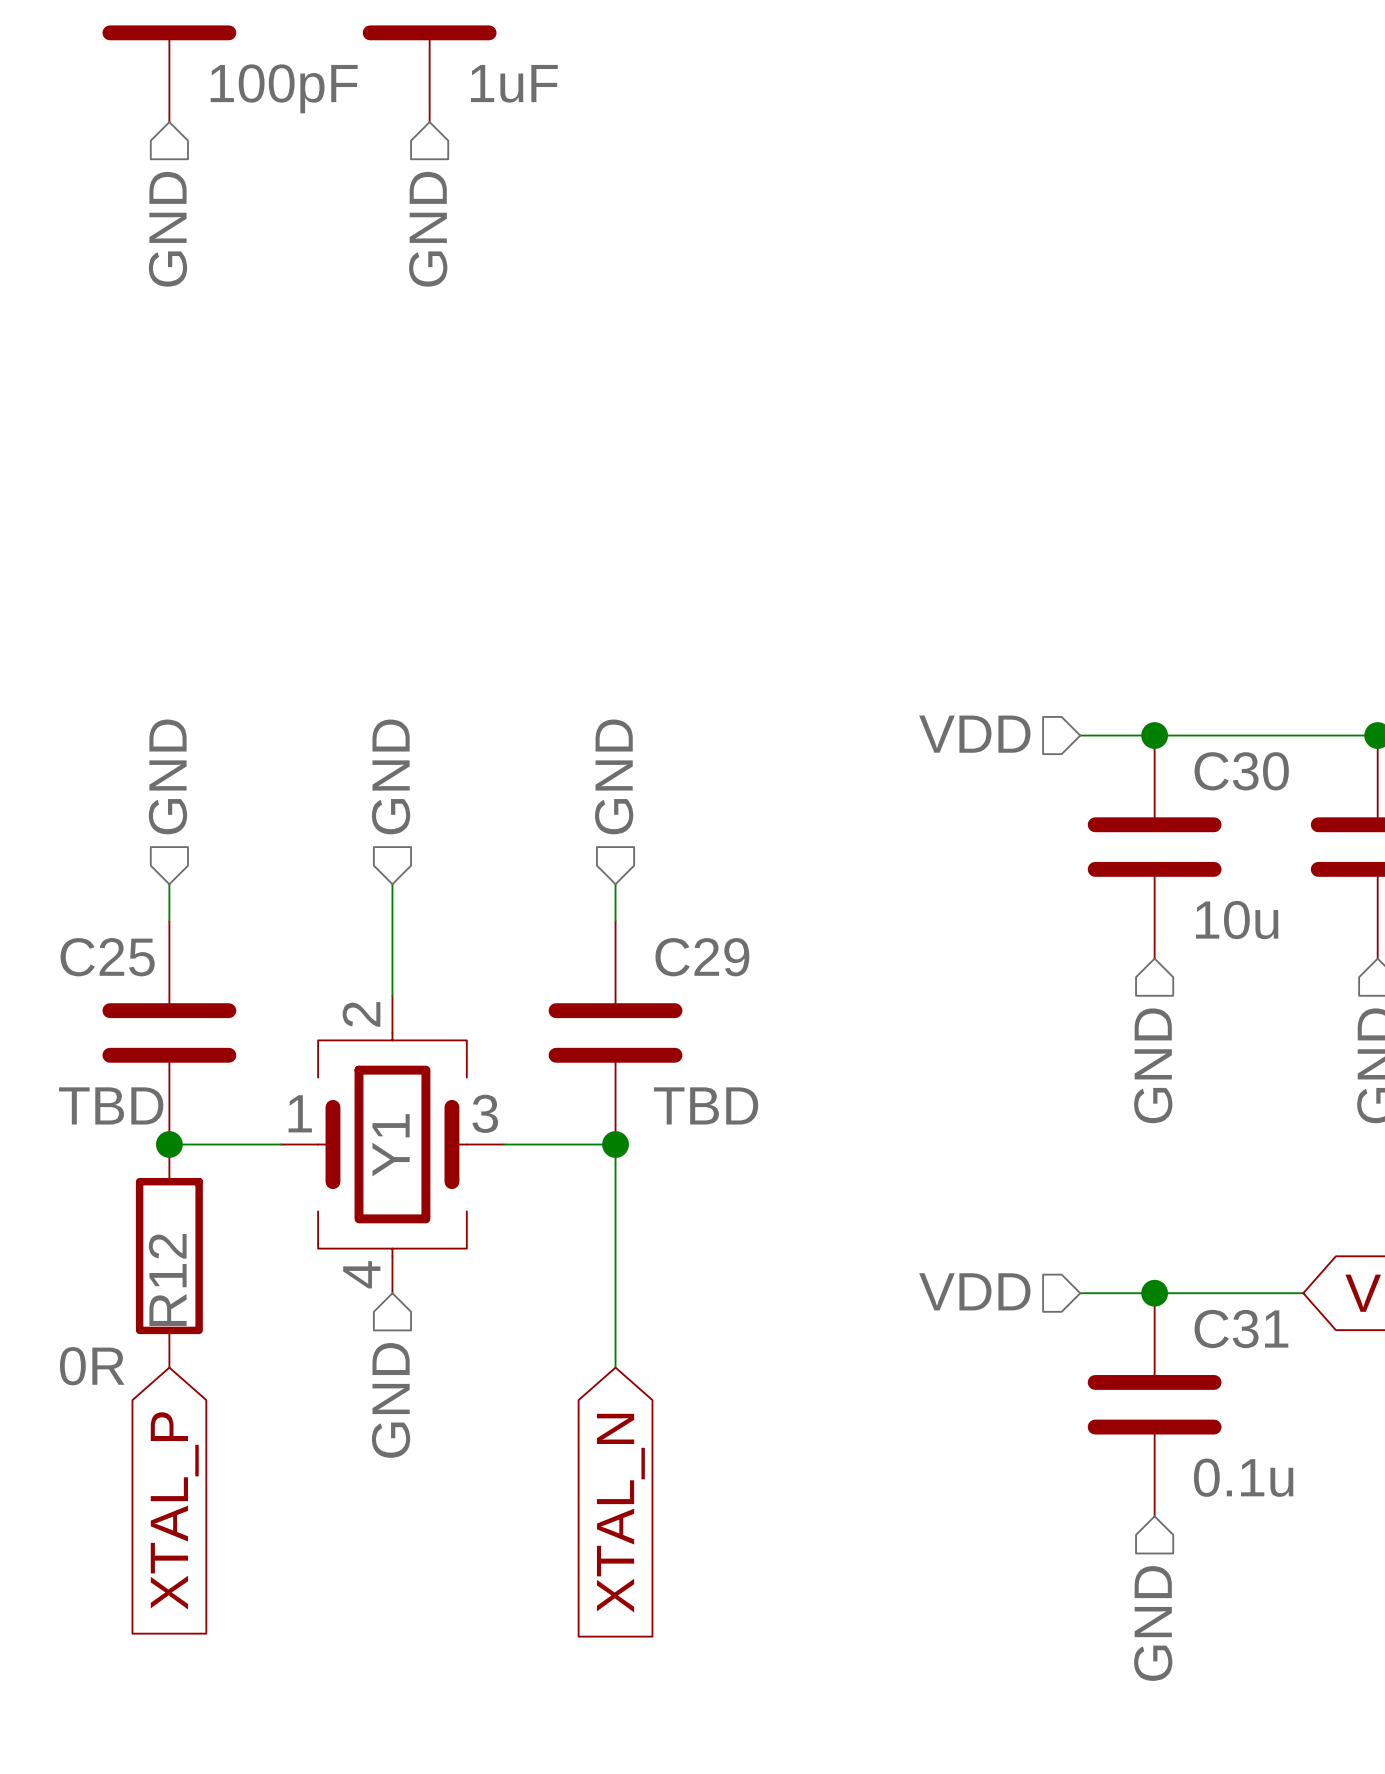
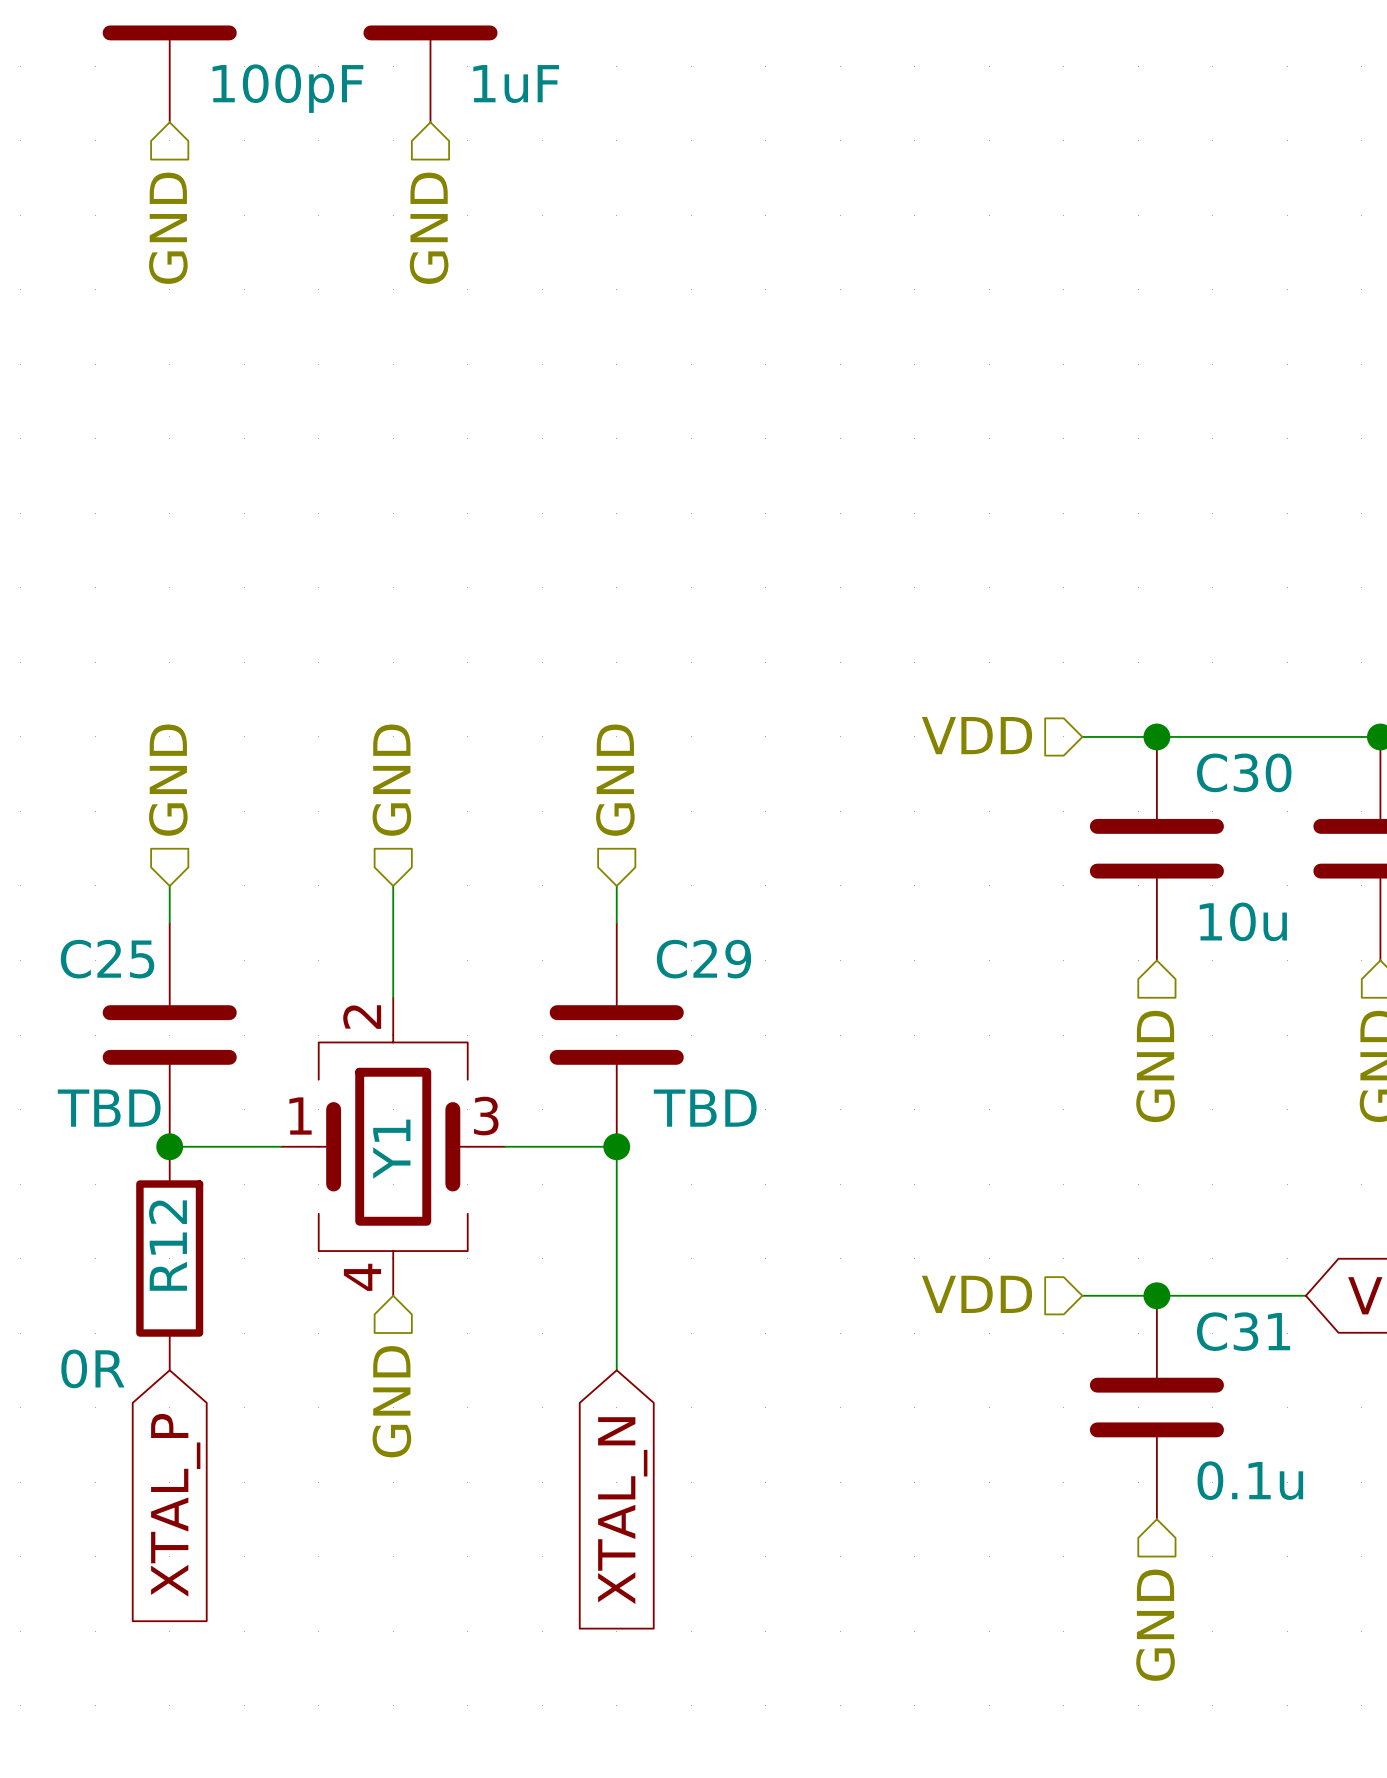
R12 name position: R12 (167, 1279) -> R12 (167, 1245)

